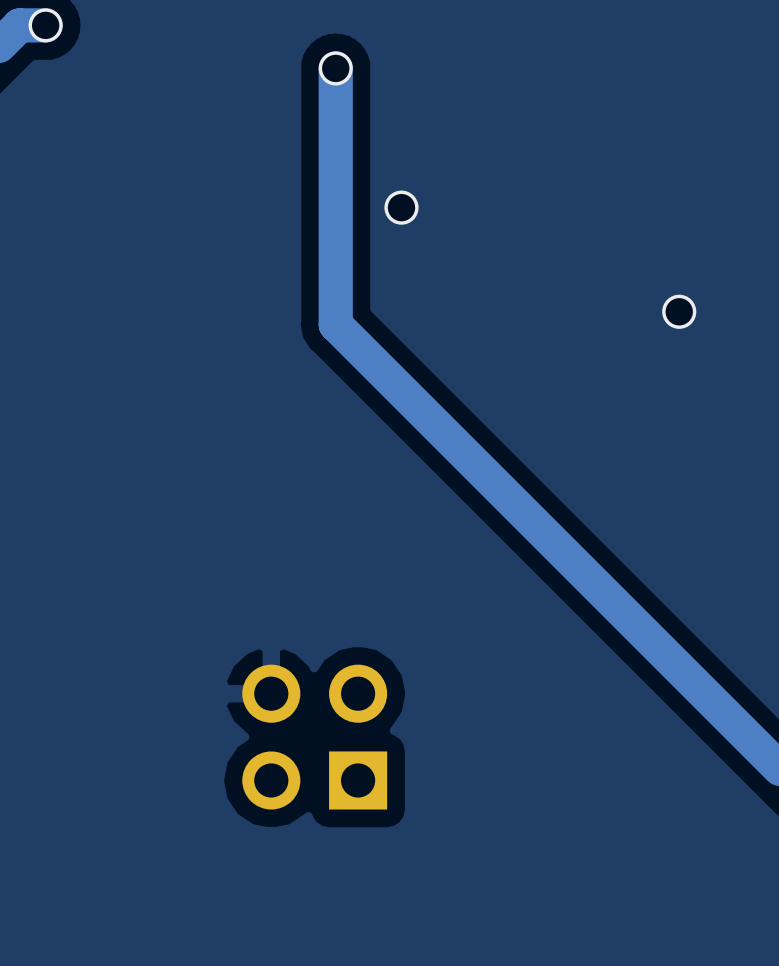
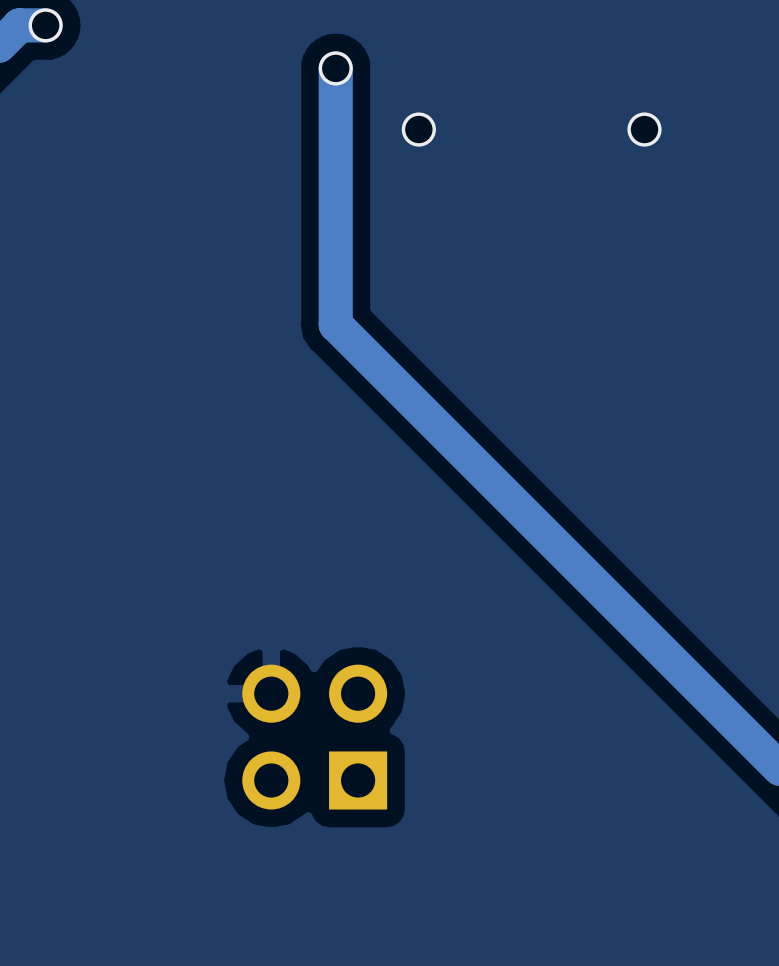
via: none -> (644, 129)
via position: (401, 207) -> (418, 129)
via: (679, 311) -> none

